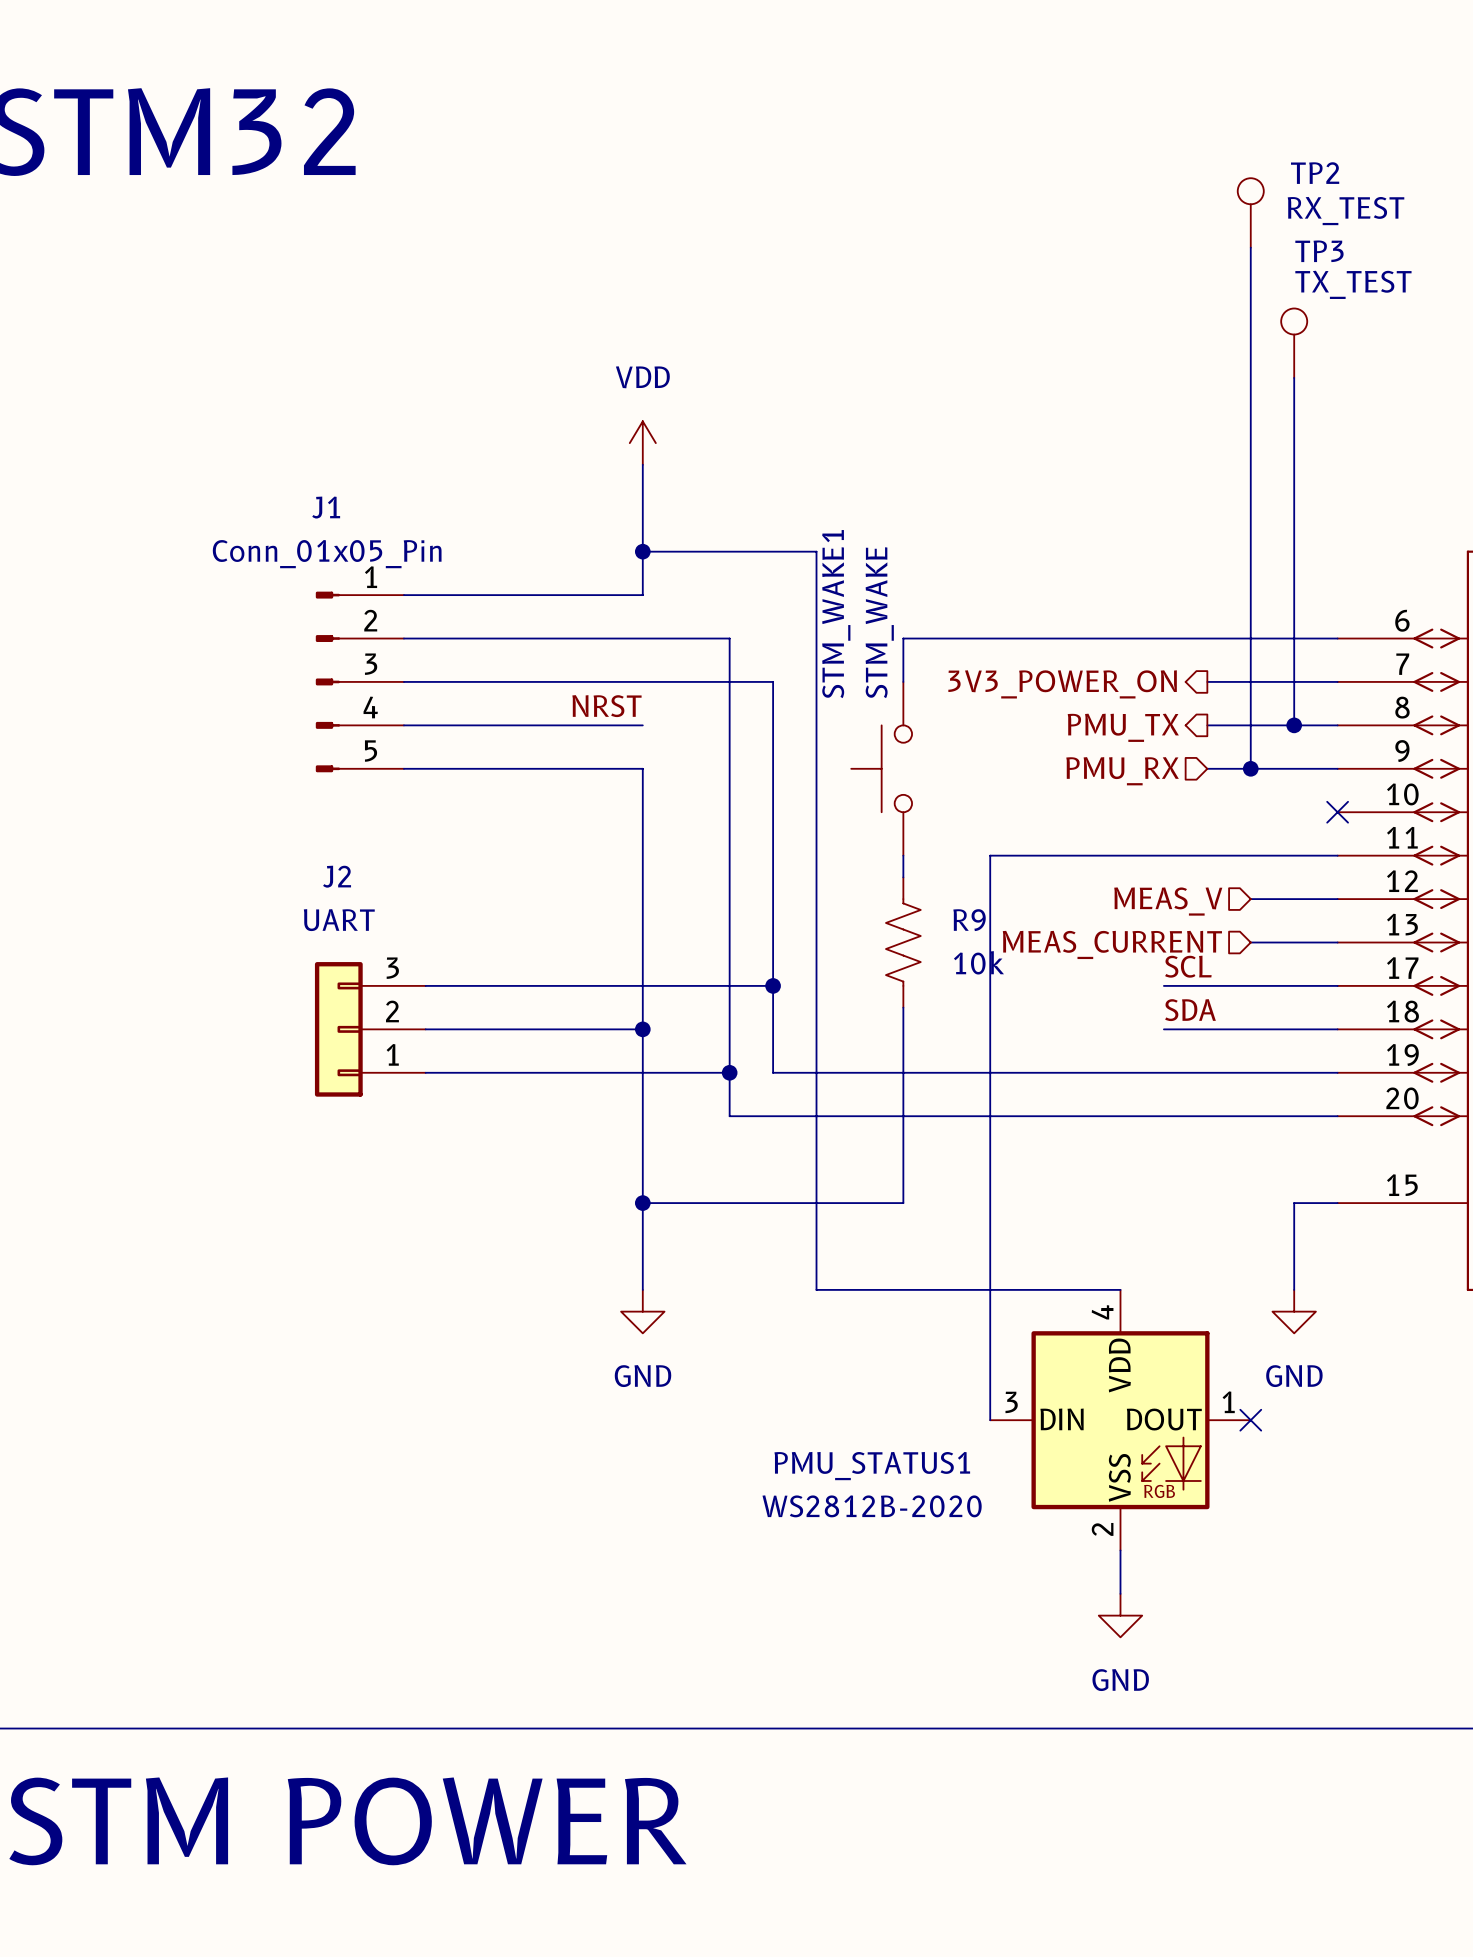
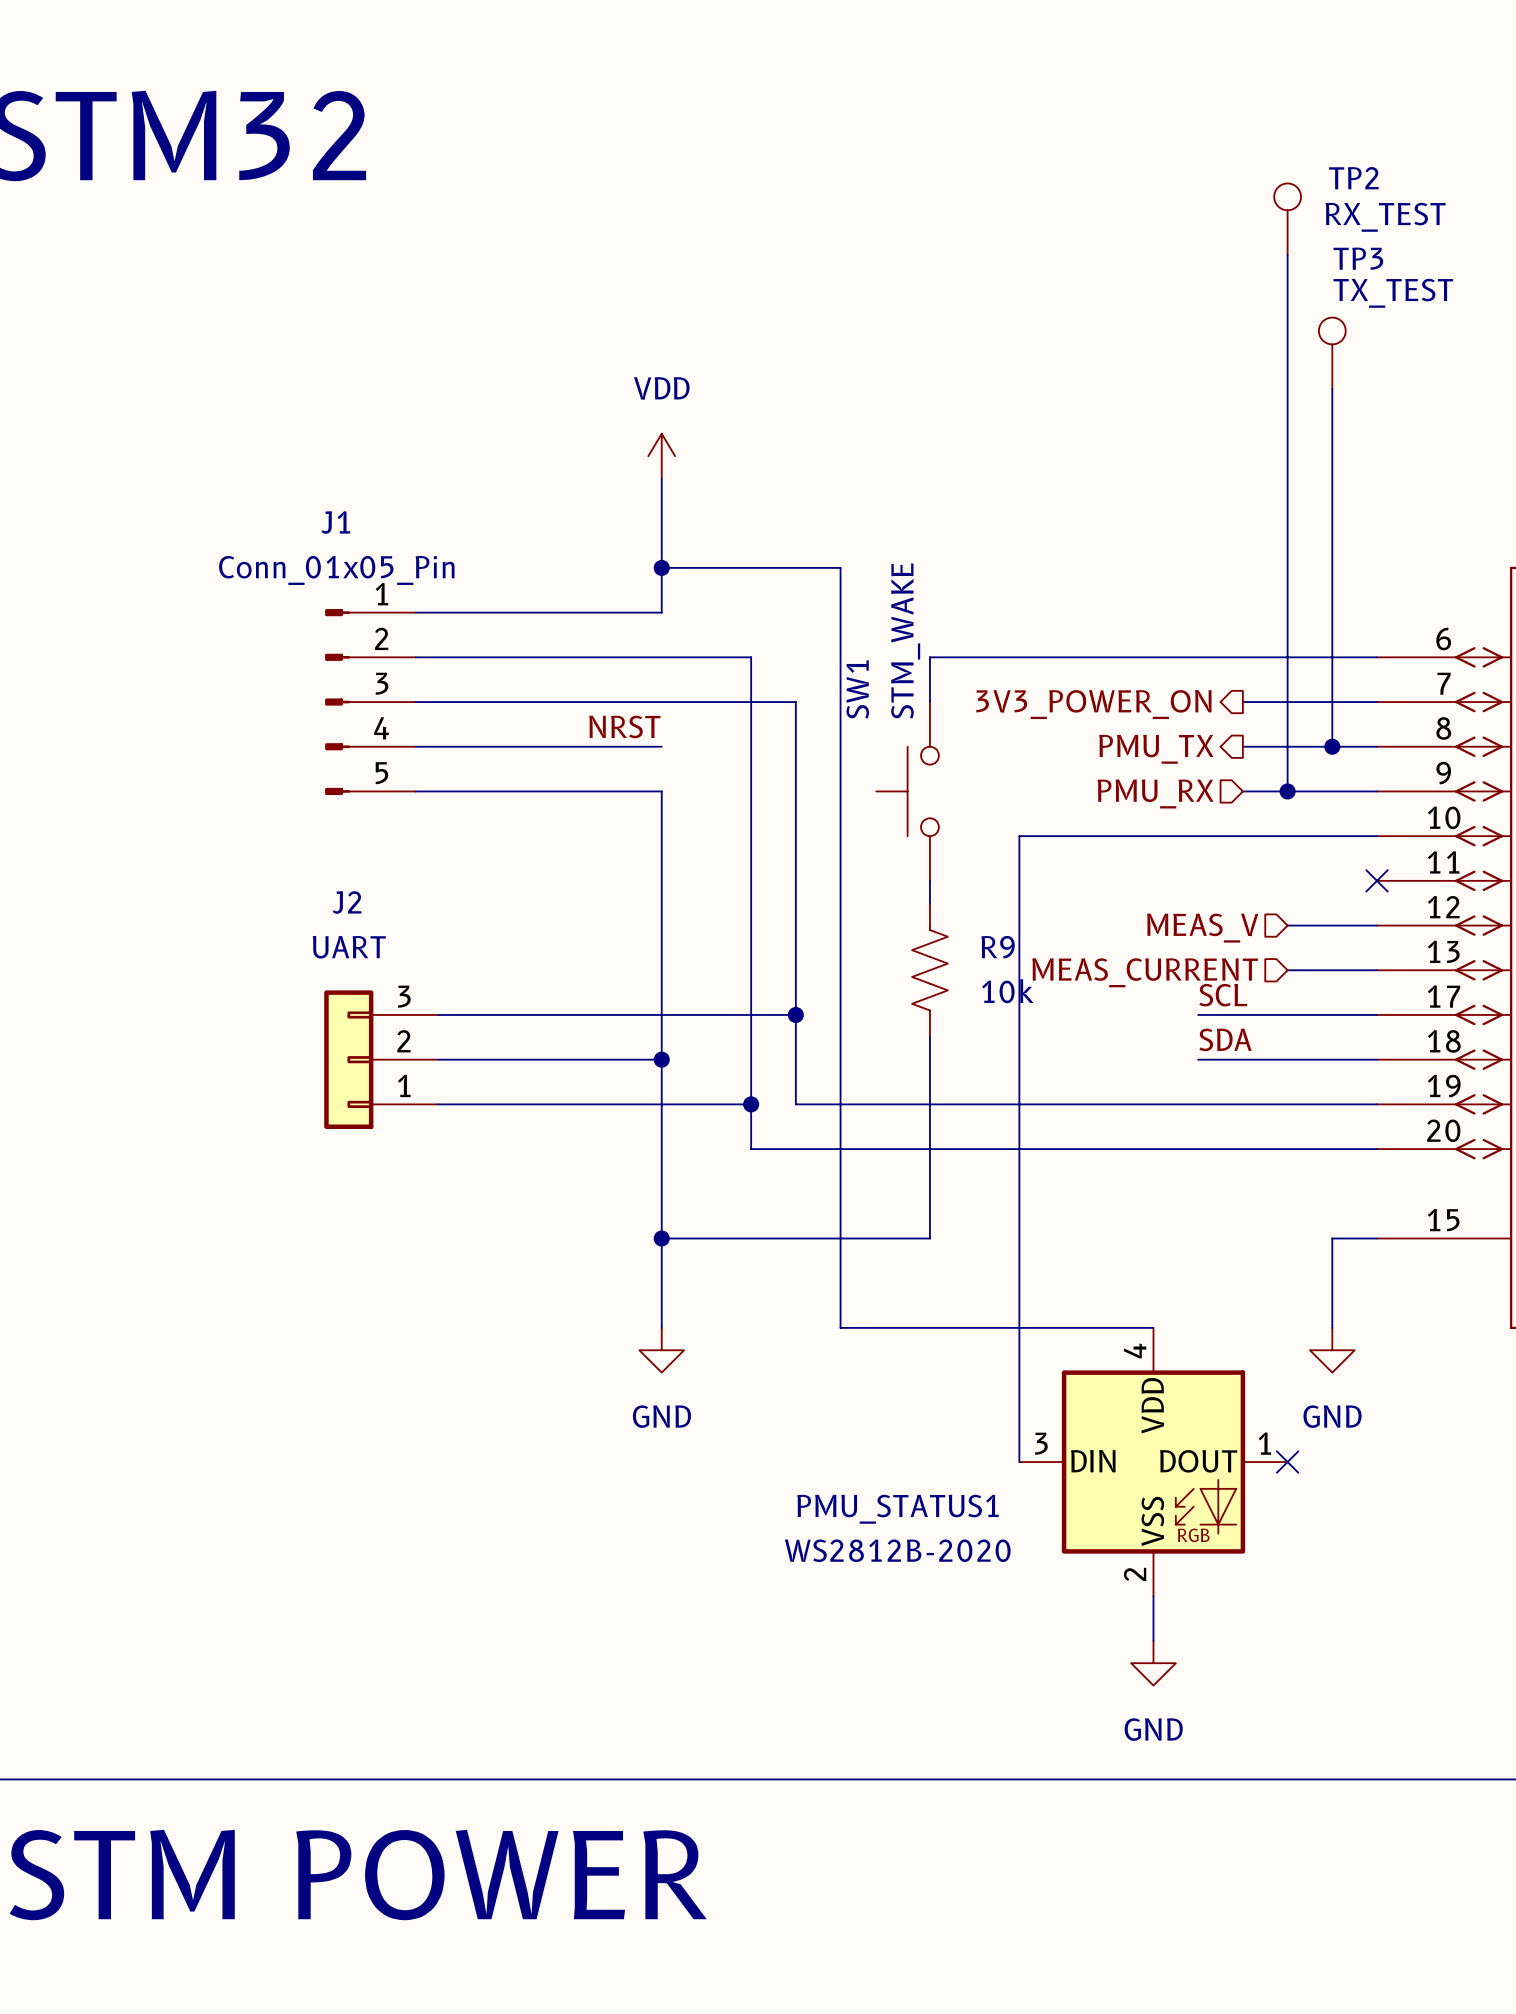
STM_WAKE1 name: STM_WAKE1 (836, 614) -> SW1 (857, 689)
no-connect mark position: (1337, 812) -> (1377, 880)
wire: (990, 855) (1337, 855) -> (1019, 880) (1019, 836) (1377, 836)

